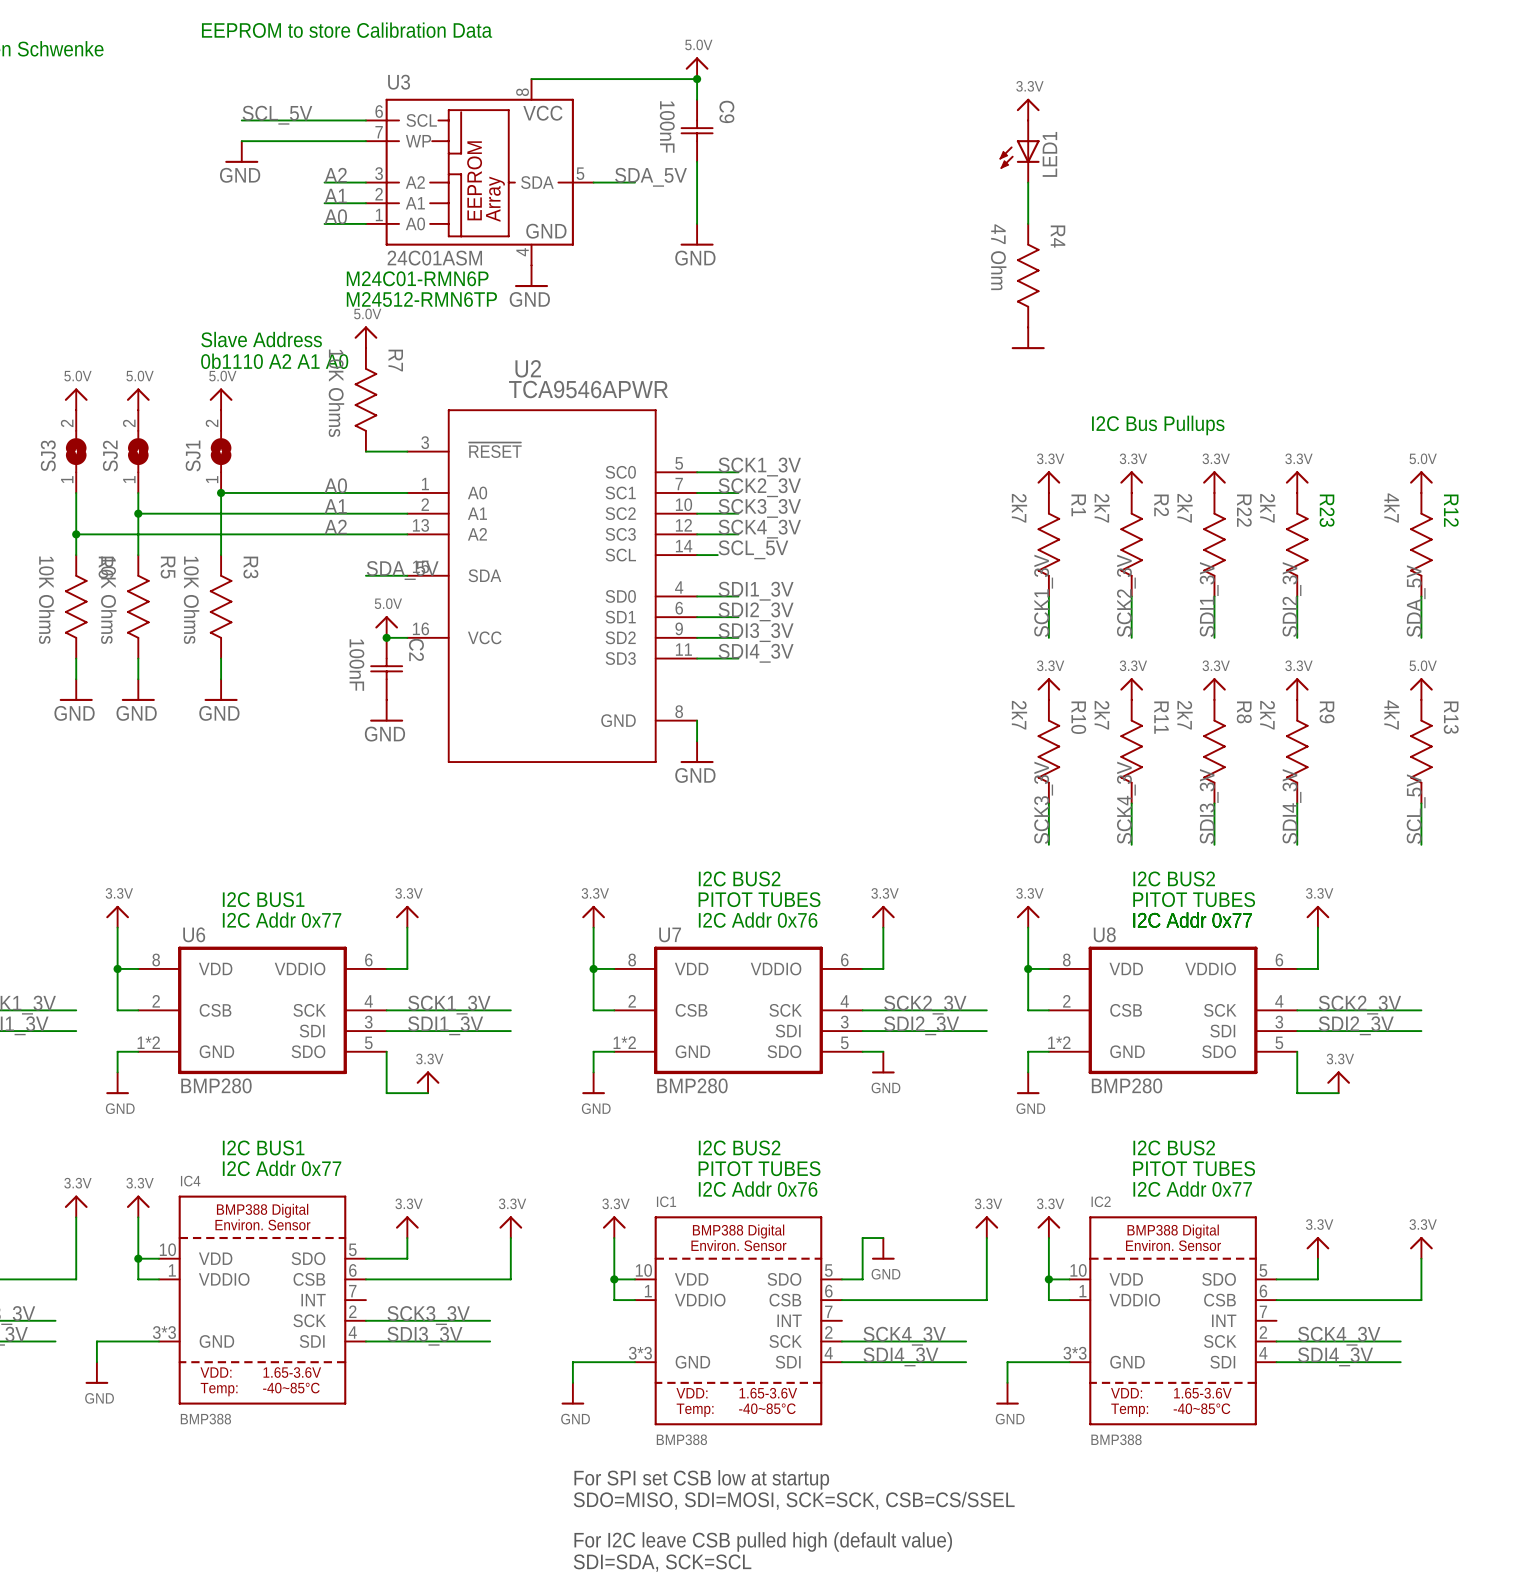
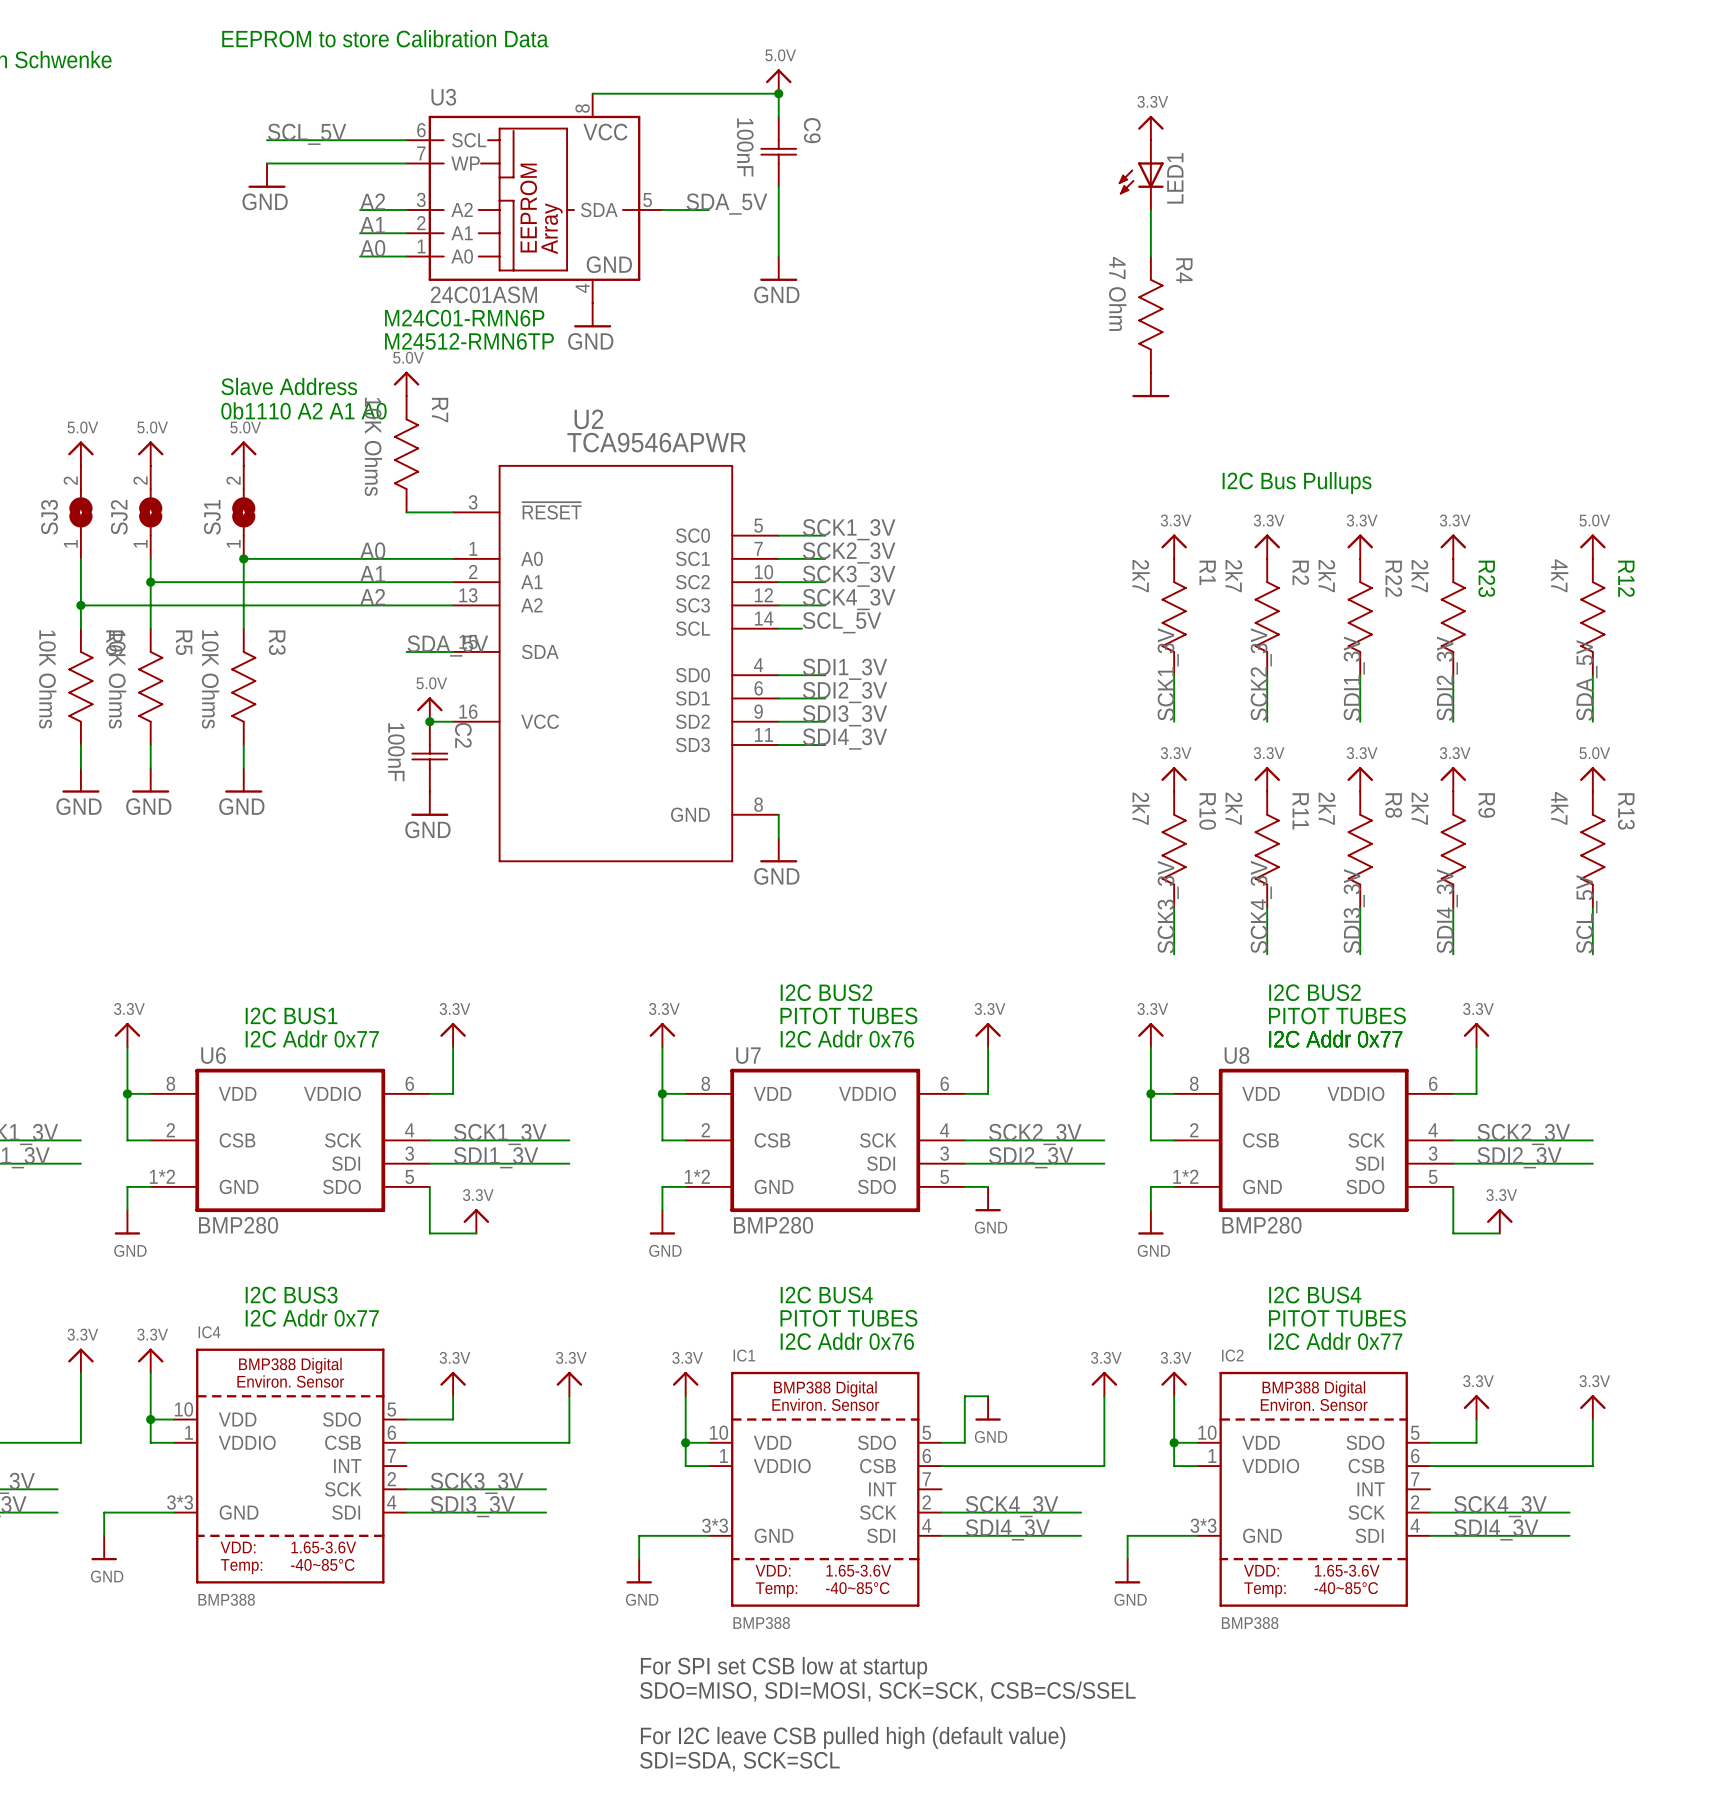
text: I2C BUS1 (263, 1147) -> I2C BUS3 (291, 1295)
text: I2C BUS2 (739, 1147) -> I2C BUS4 (826, 1295)
text: I2C BUS2 (1174, 1147) -> I2C BUS4 (1315, 1295)

